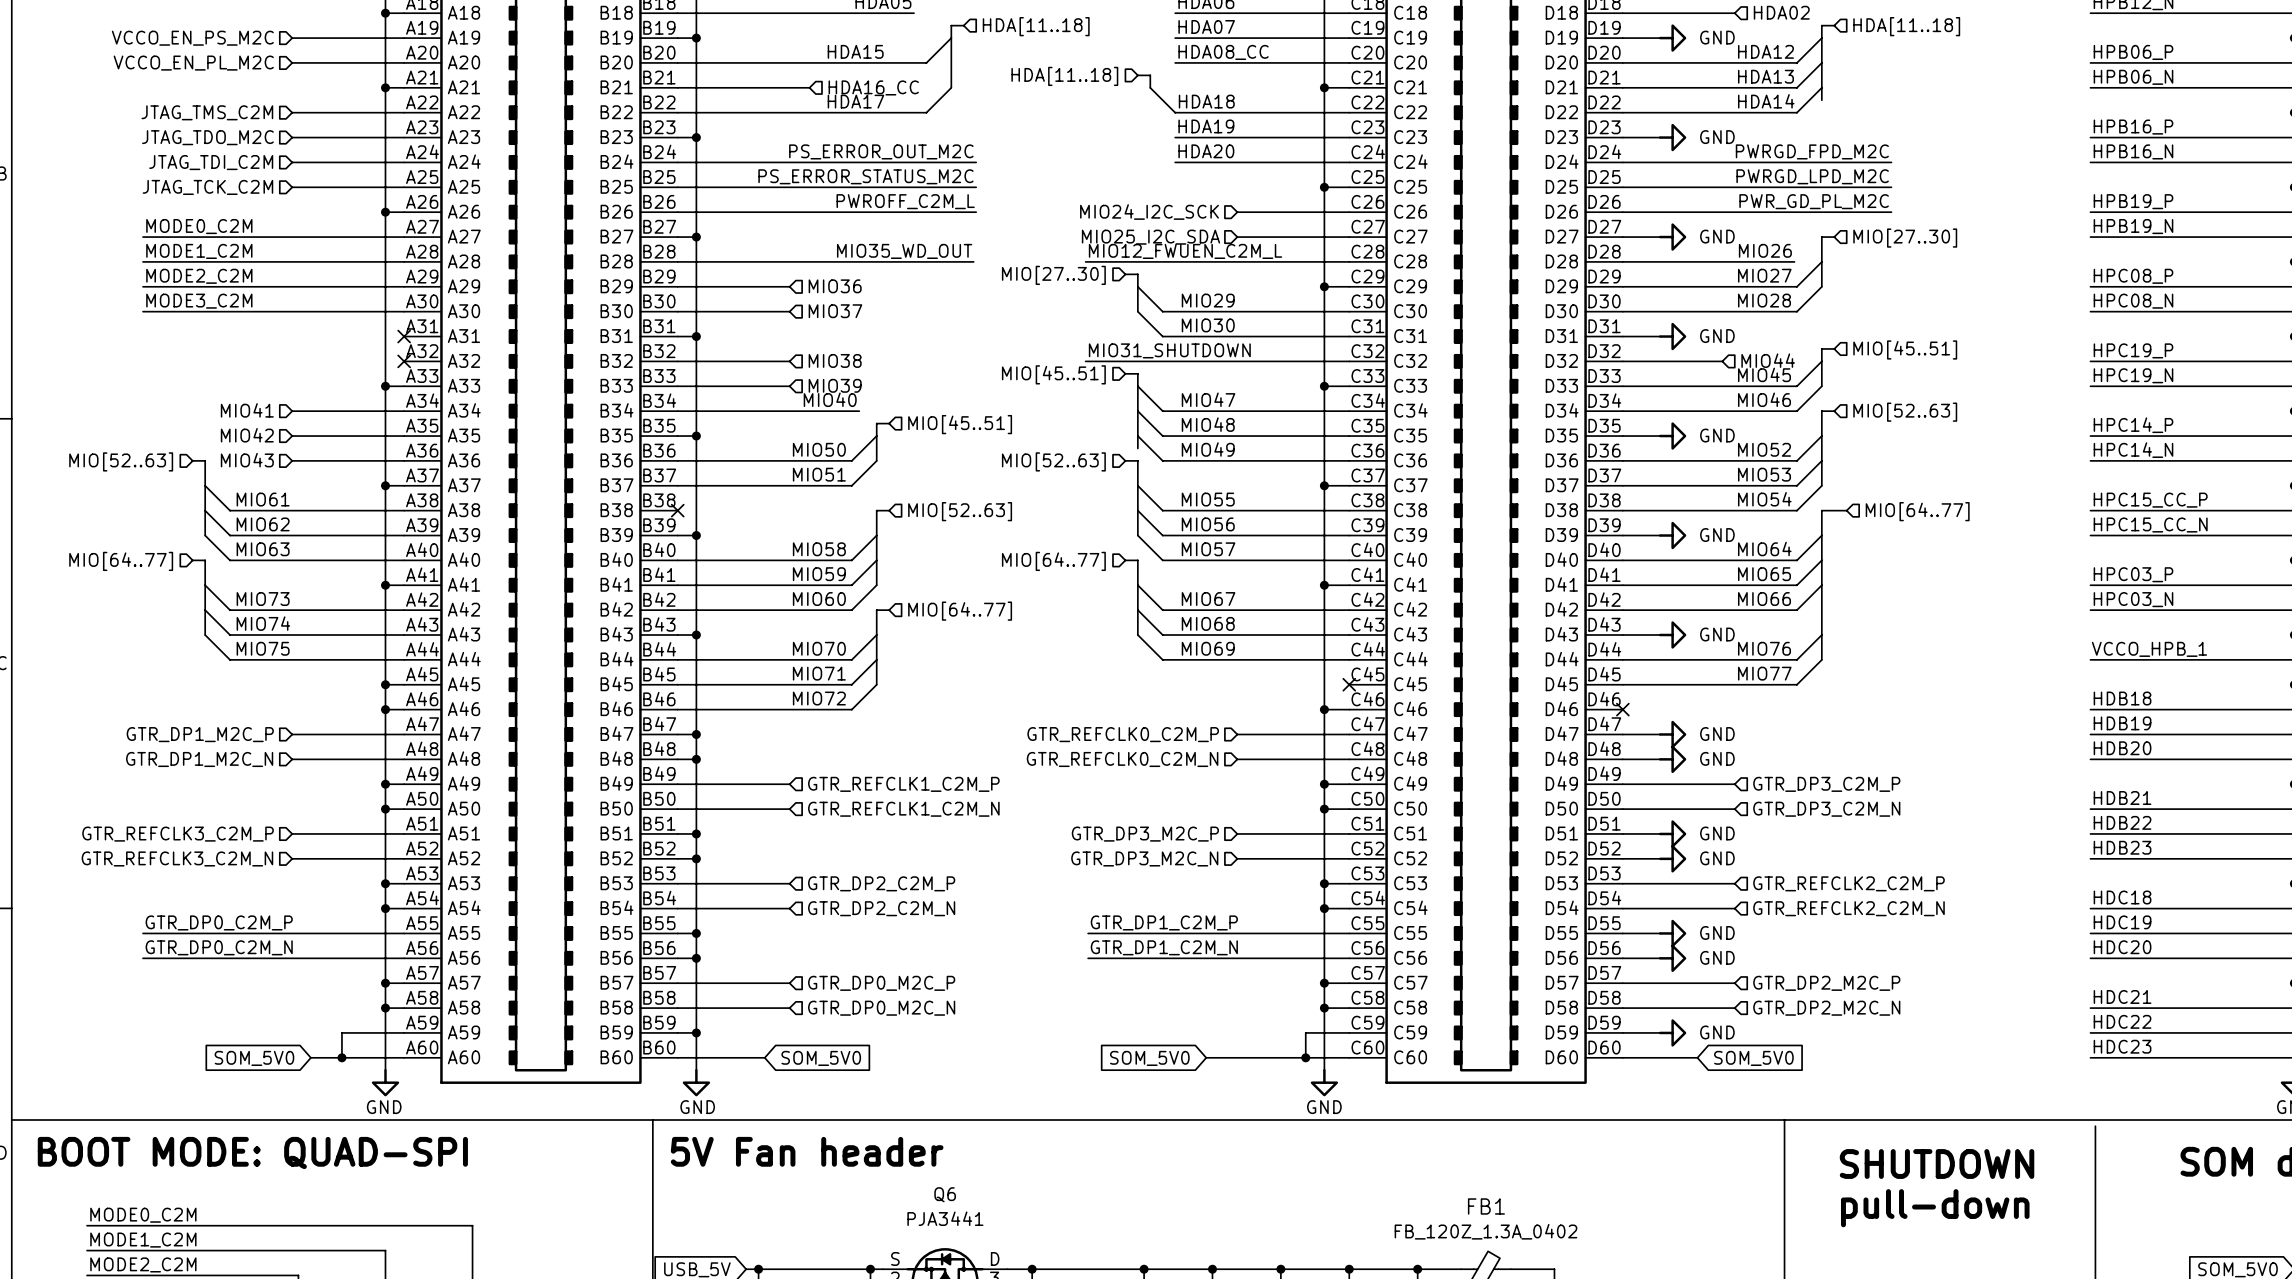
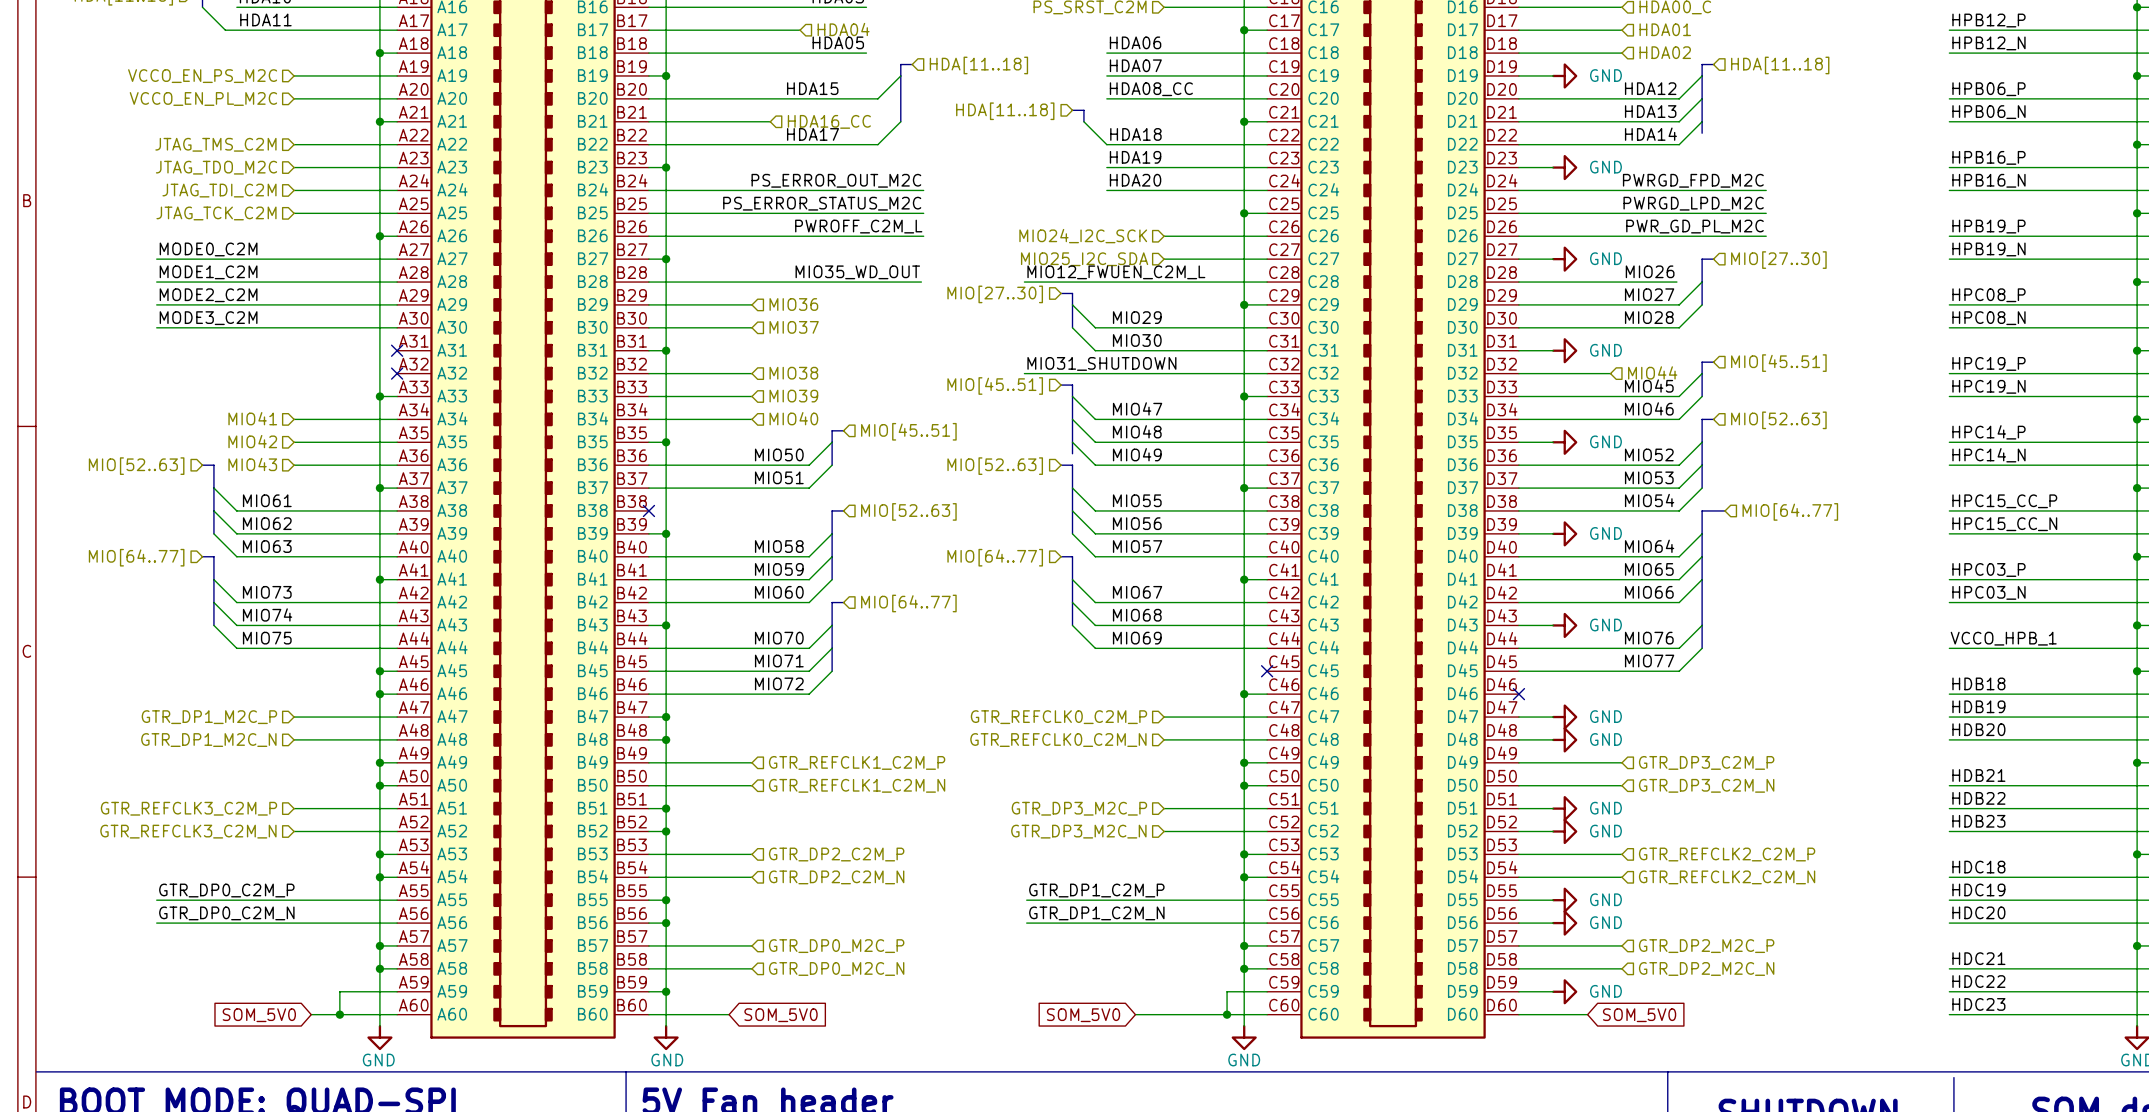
label: MIO40 (830, 399) -> none
hierarchical label: none -> MIO40 (793, 418)
wire: (789, 411) (859, 411) -> none

